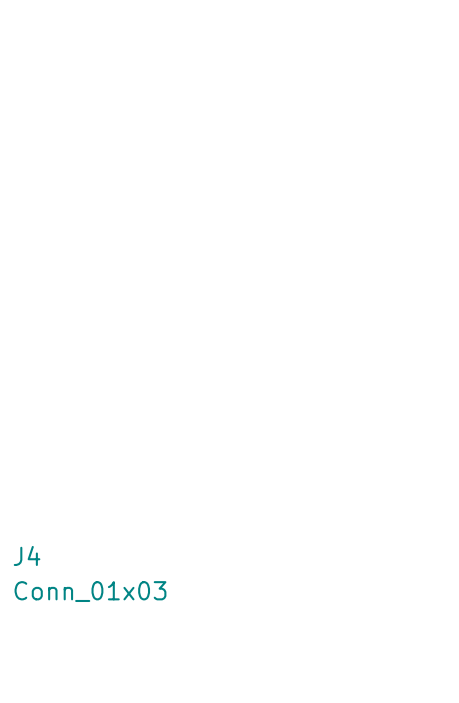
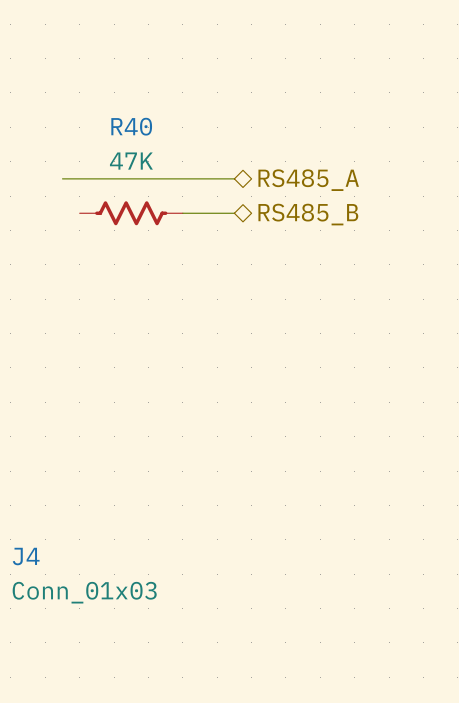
wire: none -> (62, 178) (234, 178)
hierarchical label: none -> RS485_A (308, 180)
R40: none -> 47K (131, 213)
wire: none -> (182, 213) (234, 213)
hierarchical label: none -> RS485_B (308, 214)

